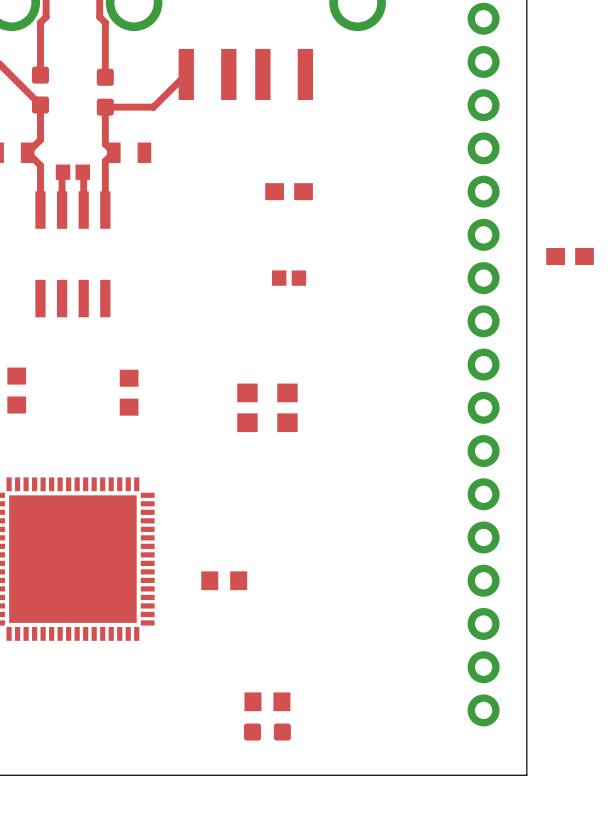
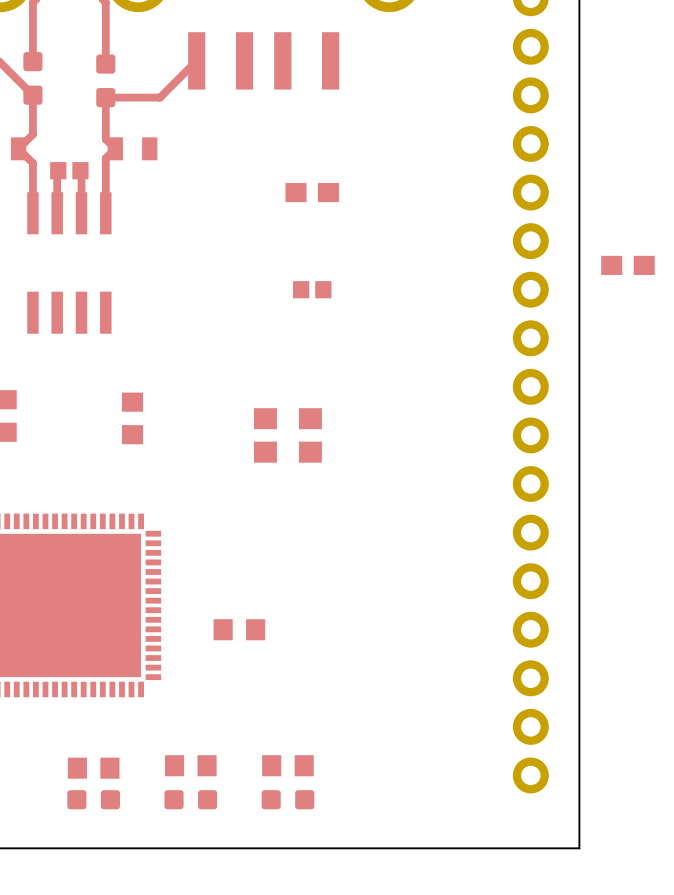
part: none -> (190, 765)
part: none -> (93, 768)
part: none -> (93, 799)
part: none -> (190, 799)

